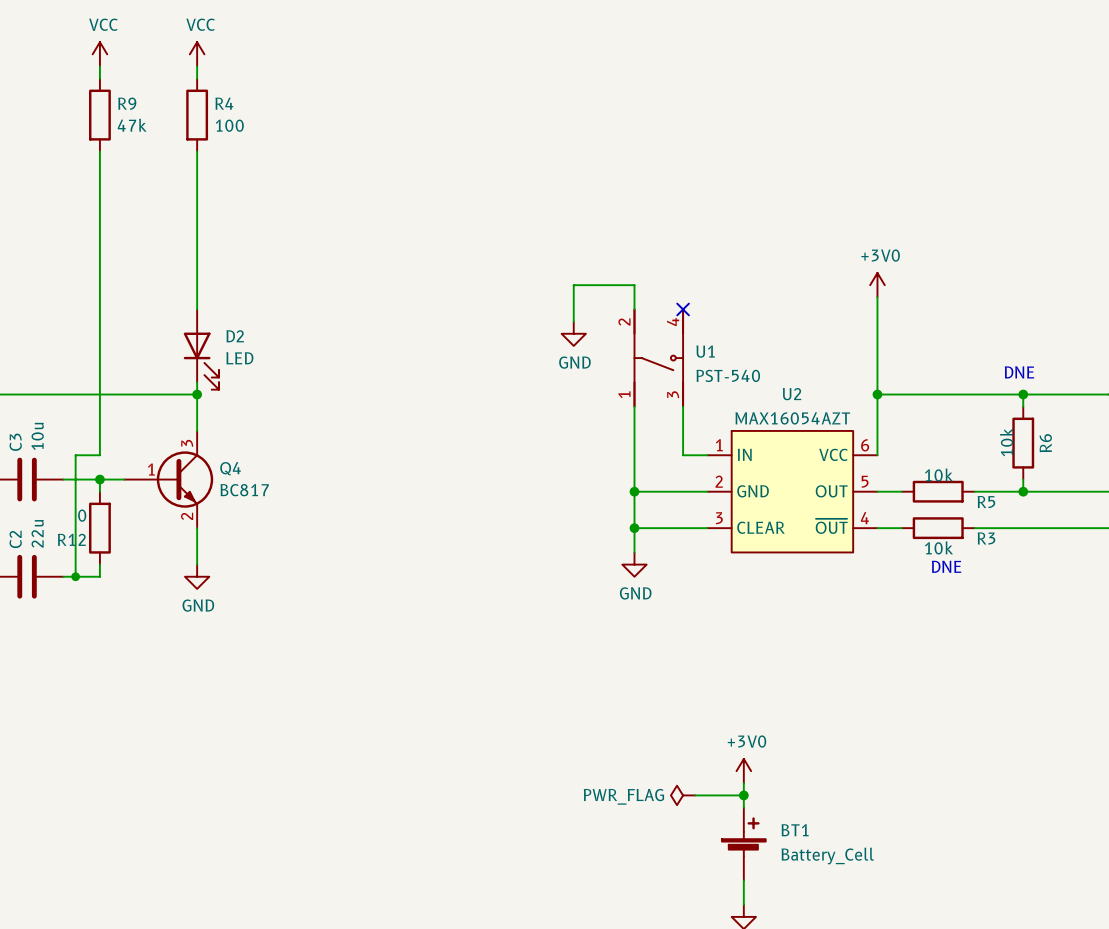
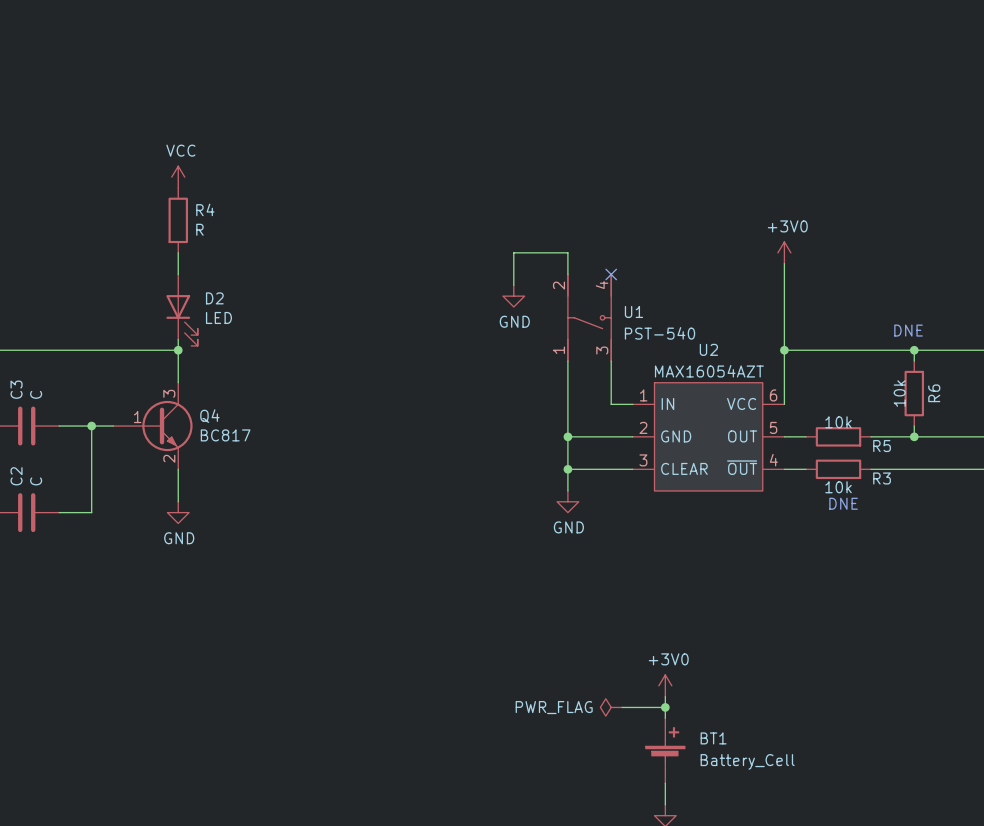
power symbol: VCC (99, 54) -> none
power symbol: VCC (197, 54) -> none
wire: (99, 66) (99, 78) -> none
wire: (197, 66) (197, 78) -> none
R9: 47k (99, 115) -> none
R4 position: (197, 115) -> (178, 220)
R4 value: 100 (229, 125) -> R (199, 229)
wire: (99, 151) (99, 455) (75, 455) (75, 576) -> none
wire: (197, 151) (197, 285) -> none
power symbol: none -> VCC (178, 177)
C3 value: 10u (37, 436) -> C (36, 394)
wire: none -> (91, 436) (91, 501)
R12: 0 (99, 528) -> none
C2 value: 22u (37, 533) -> C (36, 481)
junction: (75, 576) -> none

